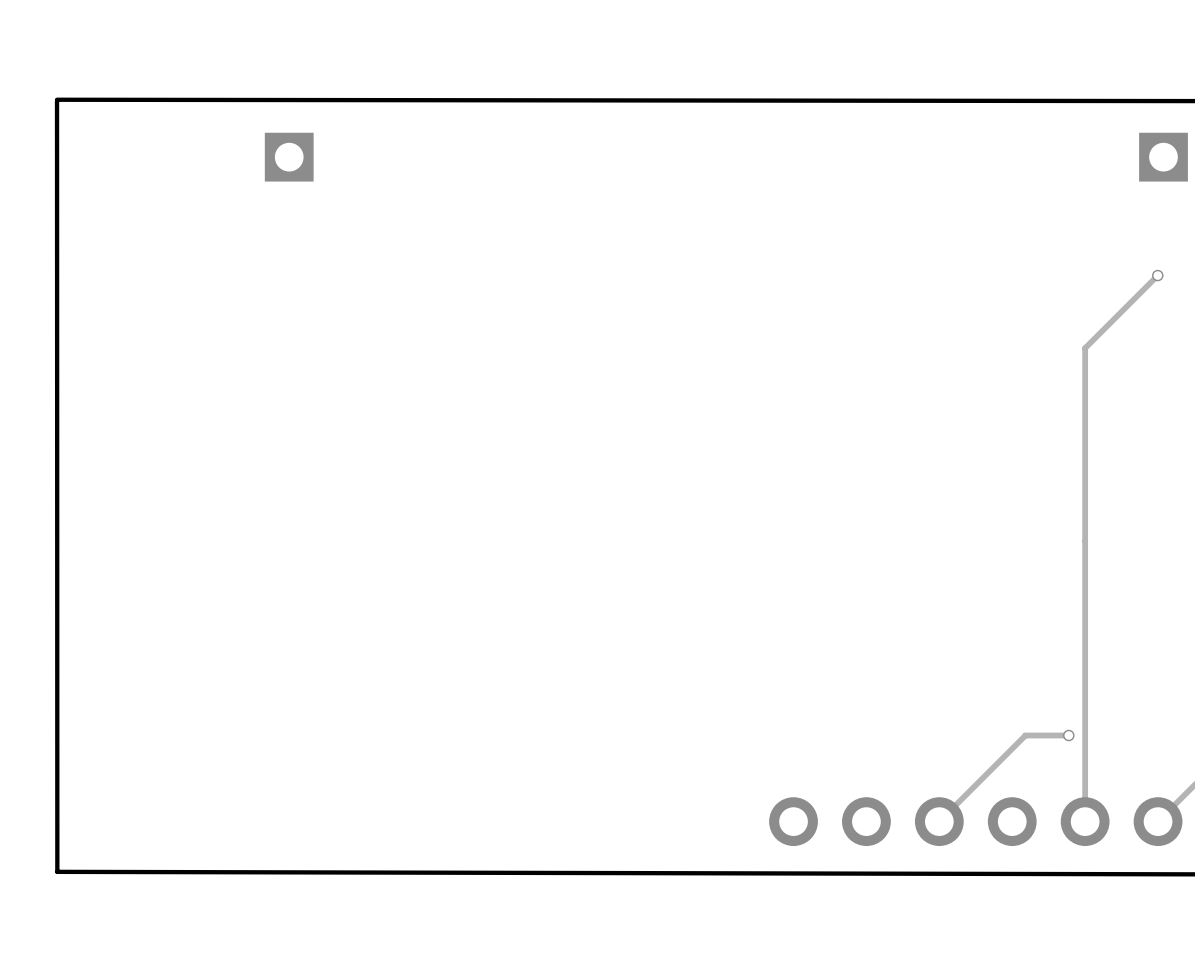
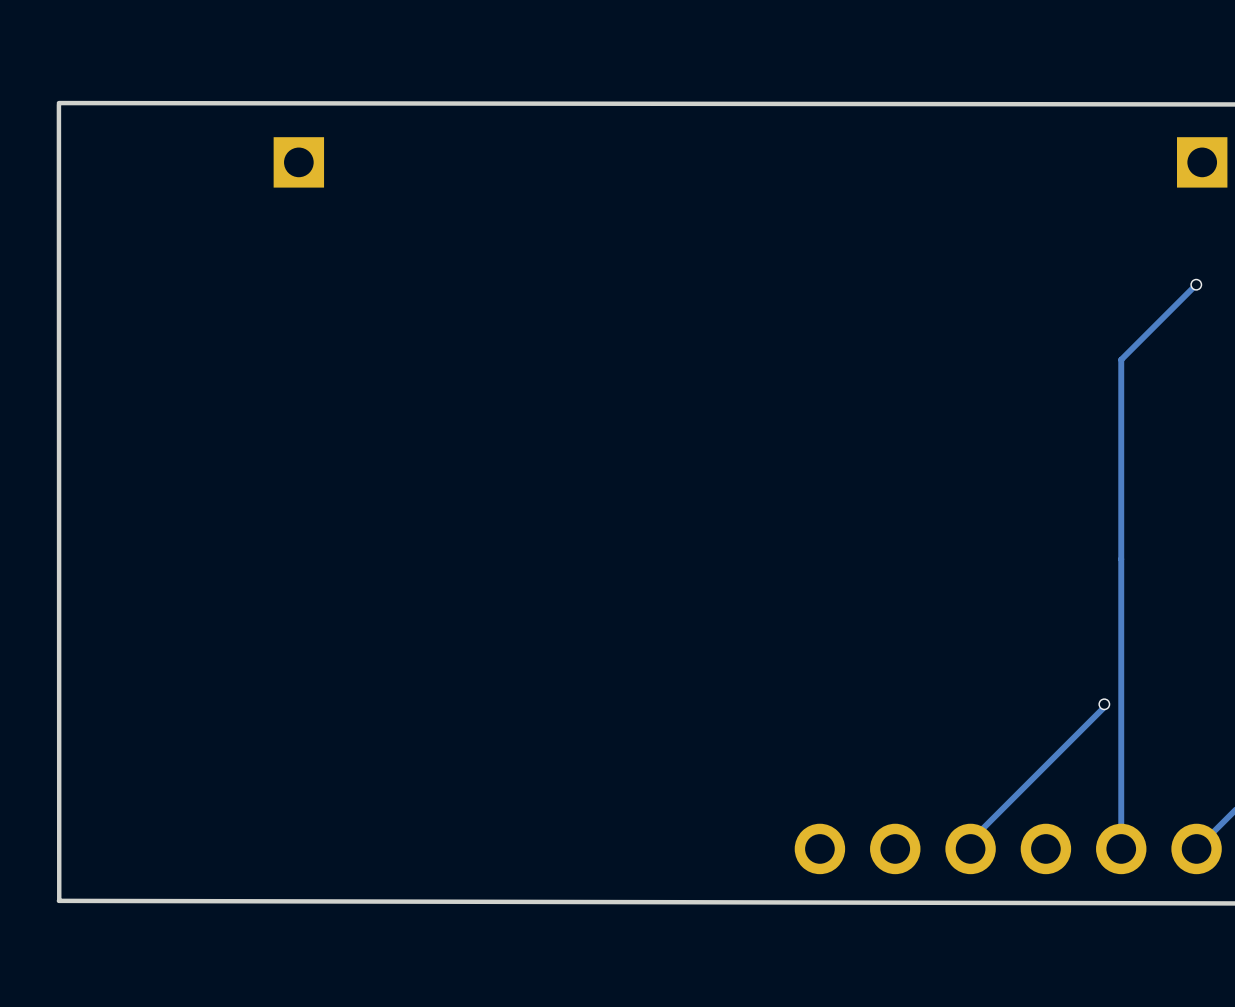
track: (1068, 735) (1025, 735) (939, 821) -> (1104, 704) (1104, 707) (970, 840) (970, 848)
via position: (1068, 735) -> (1104, 704)

